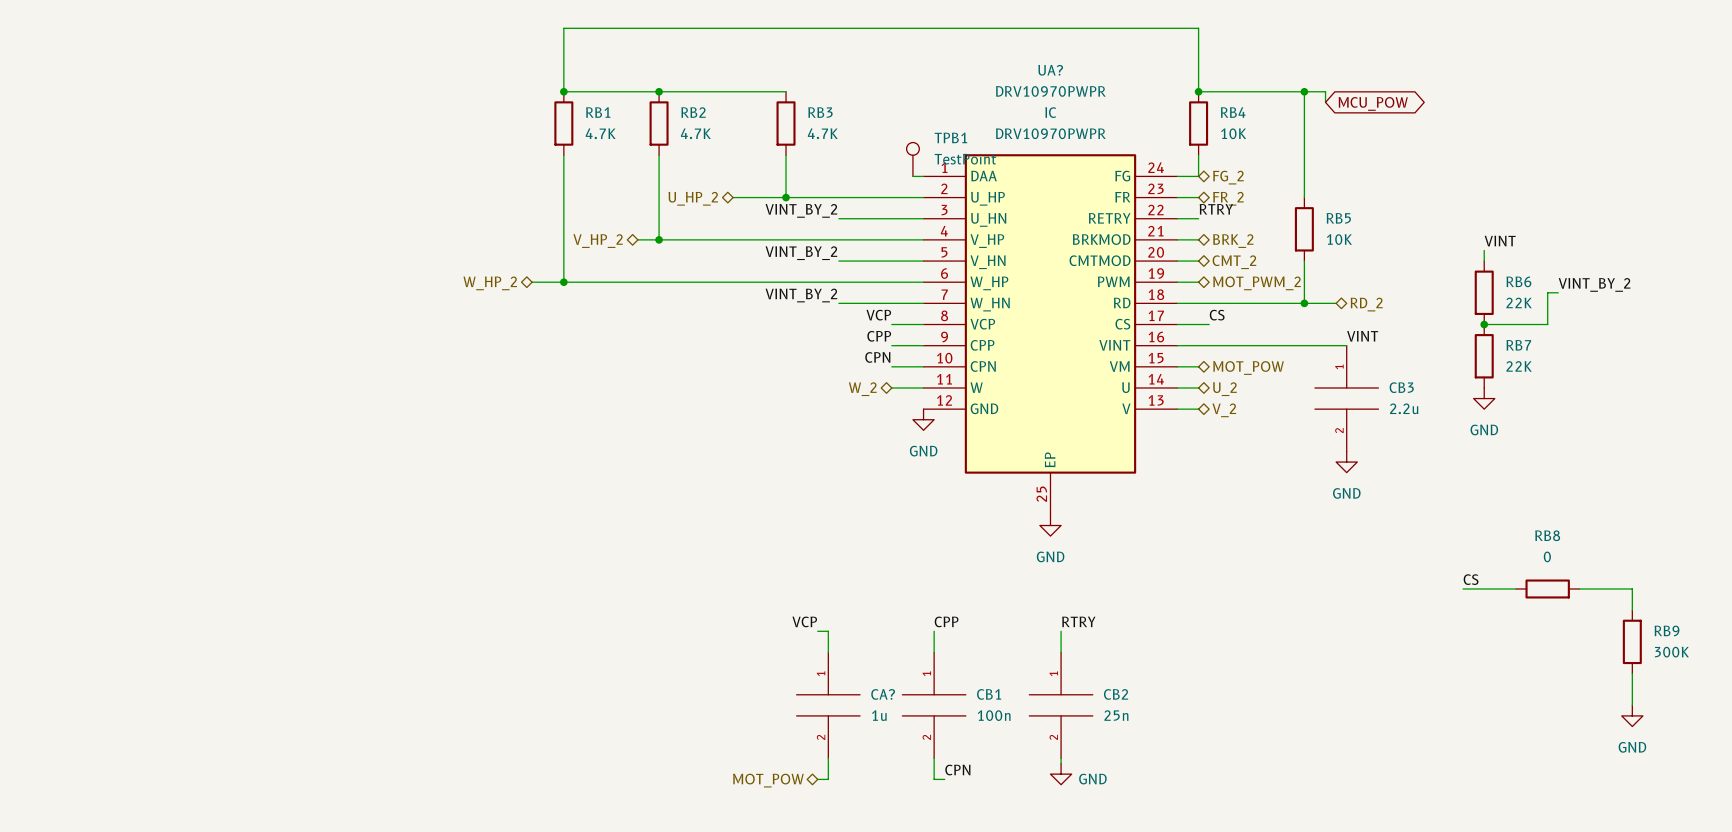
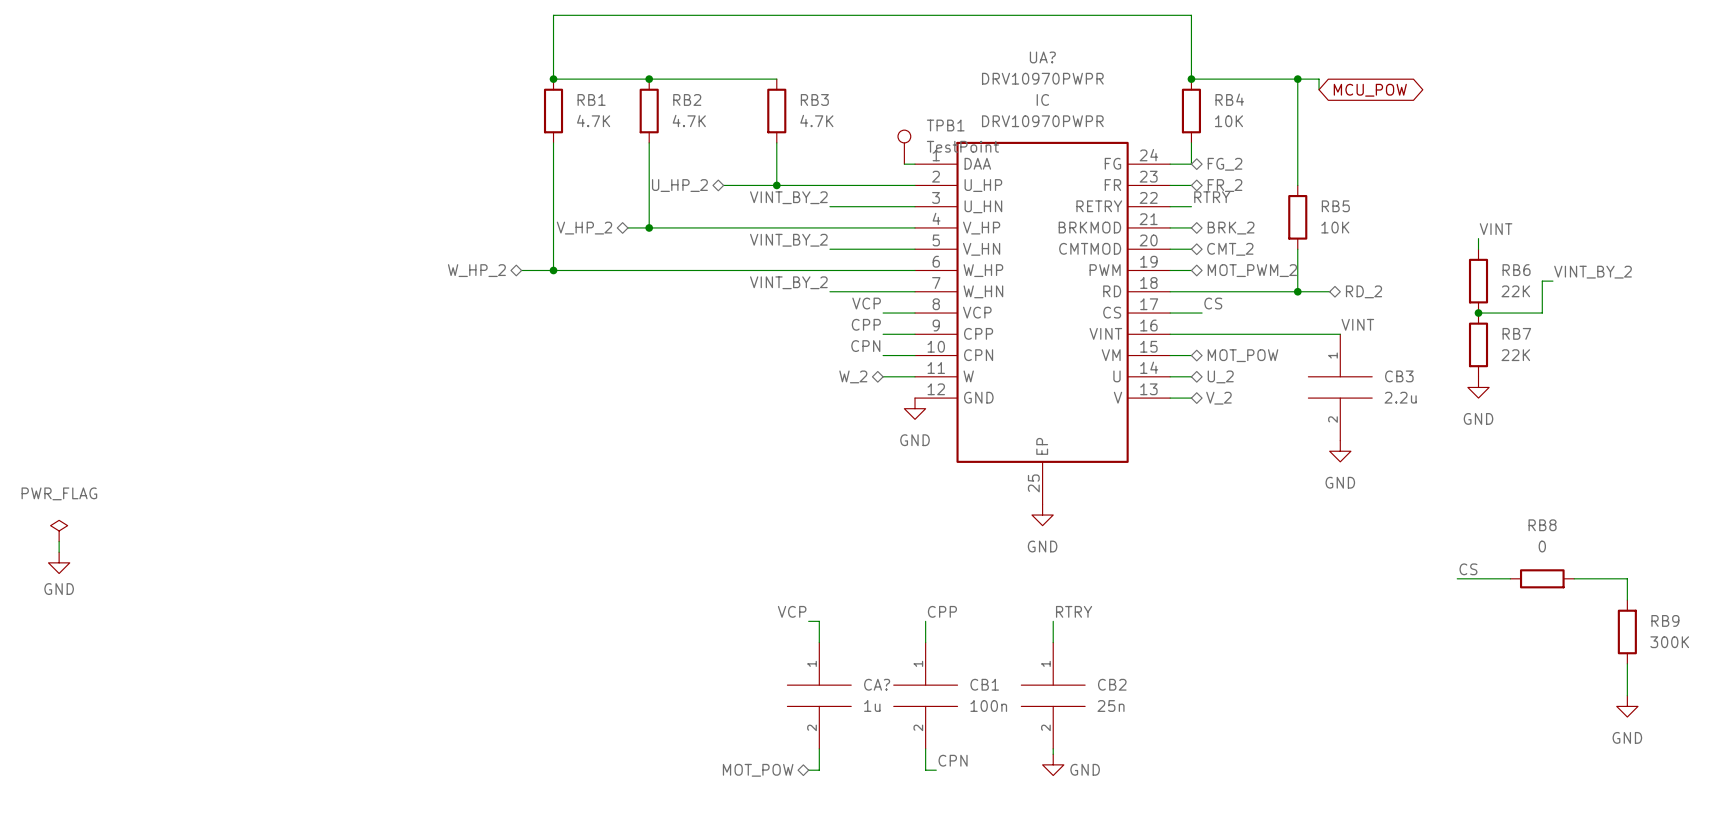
power symbol: none -> PWR_FLAG (59, 530)
wire: none -> (59, 541) (59, 552)
power symbol: none -> GND (59, 562)

